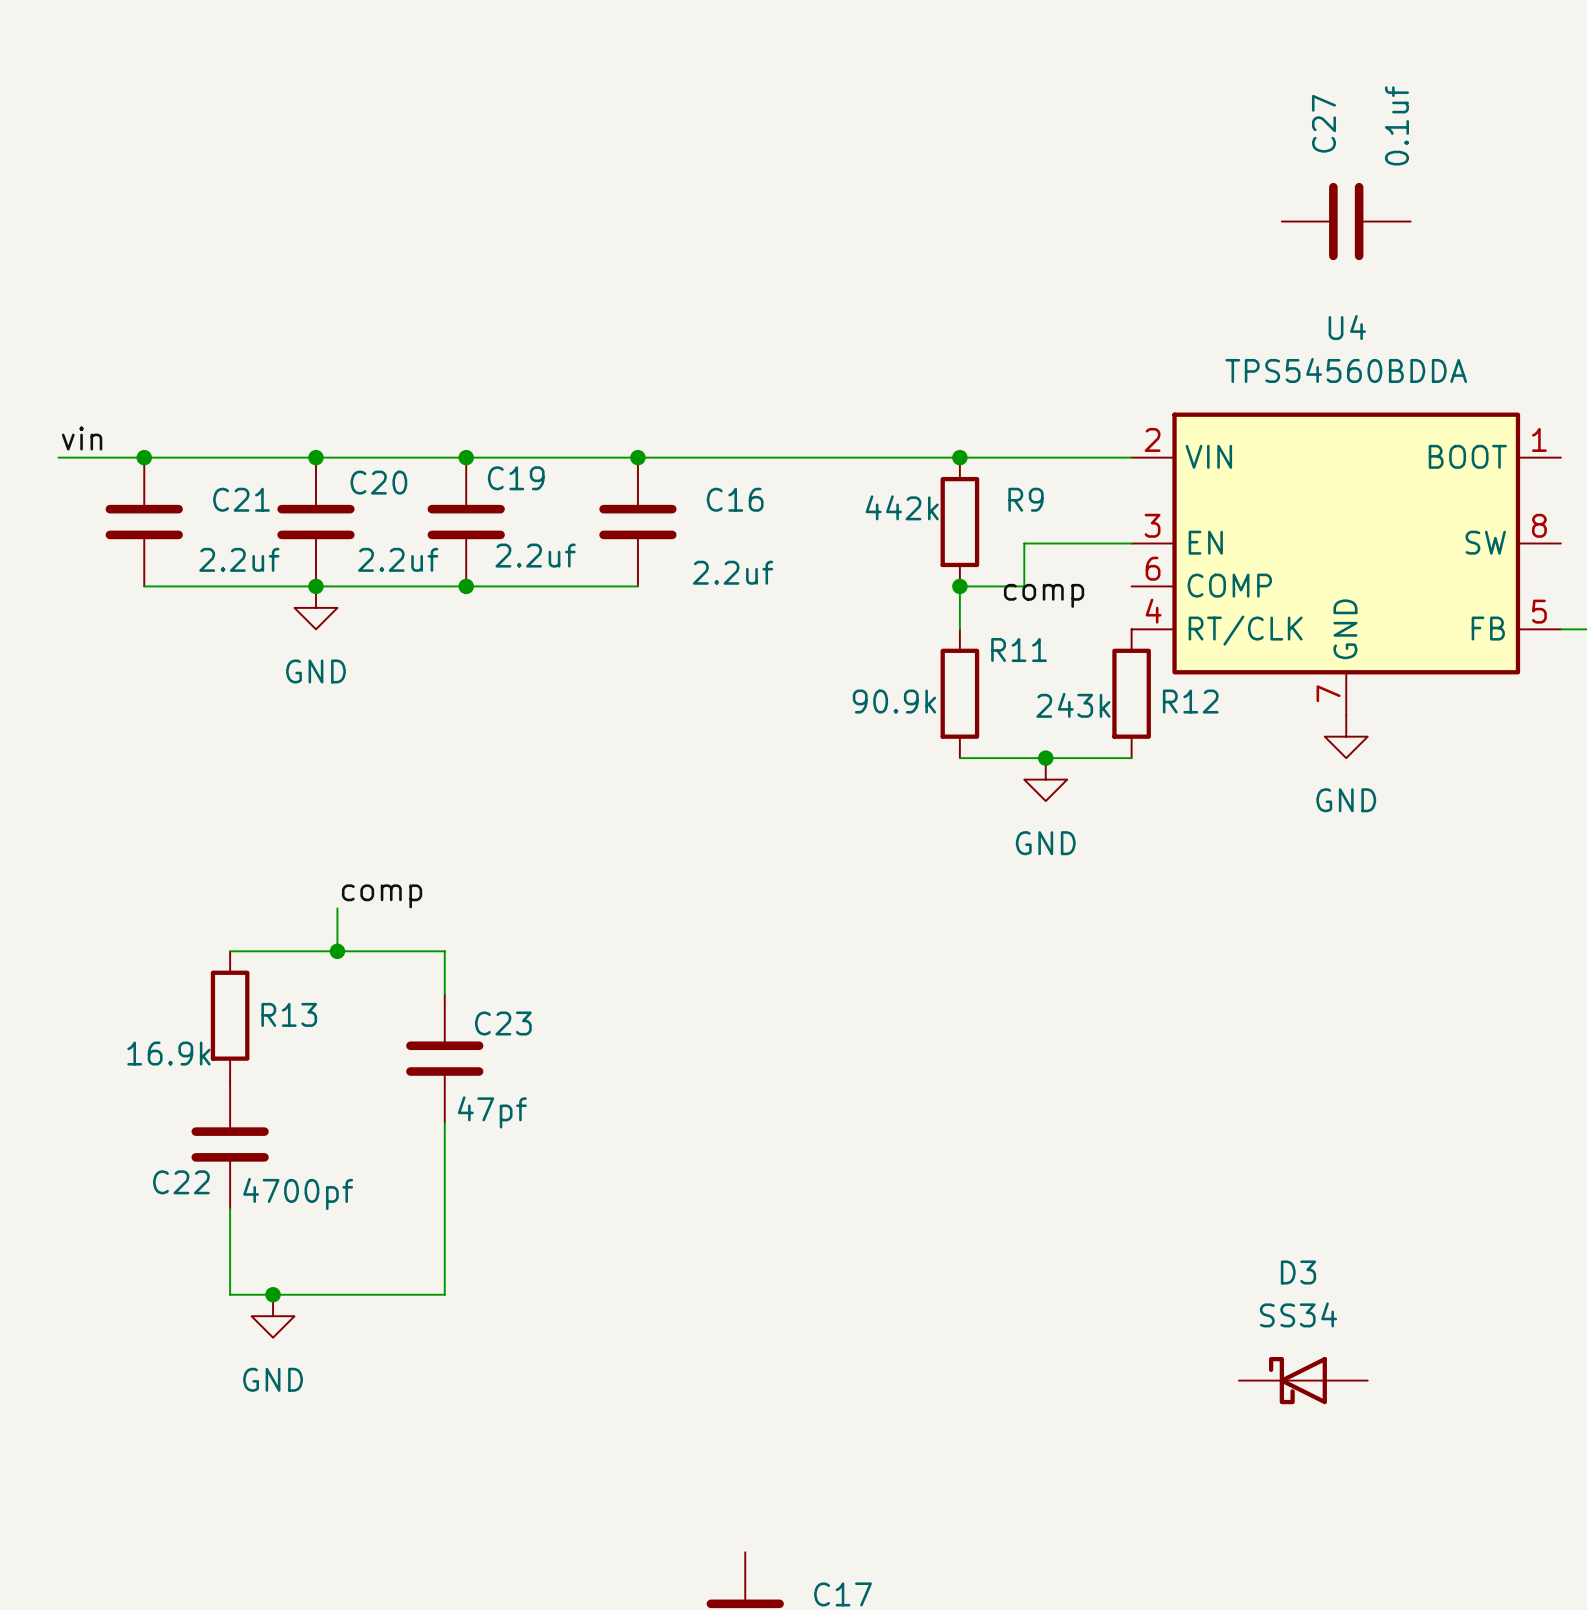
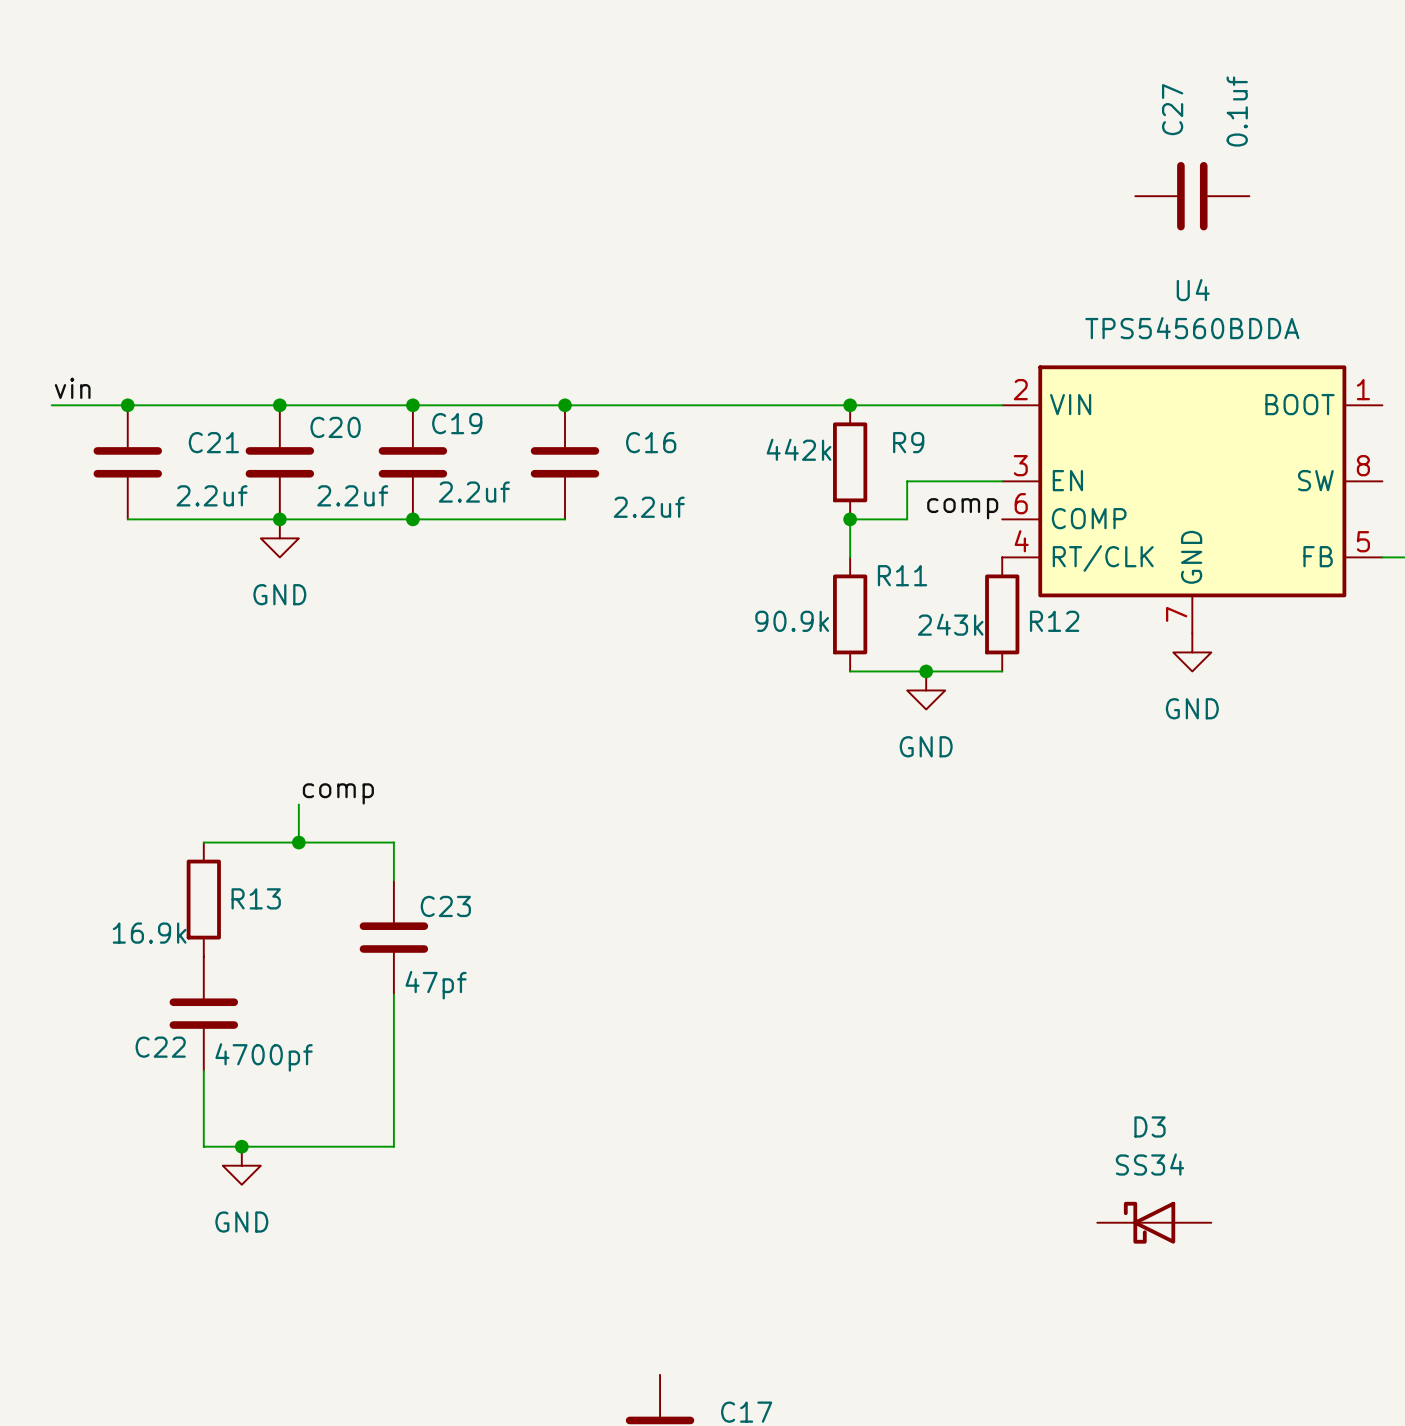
label position: comp (1044, 595) -> comp (962, 508)

